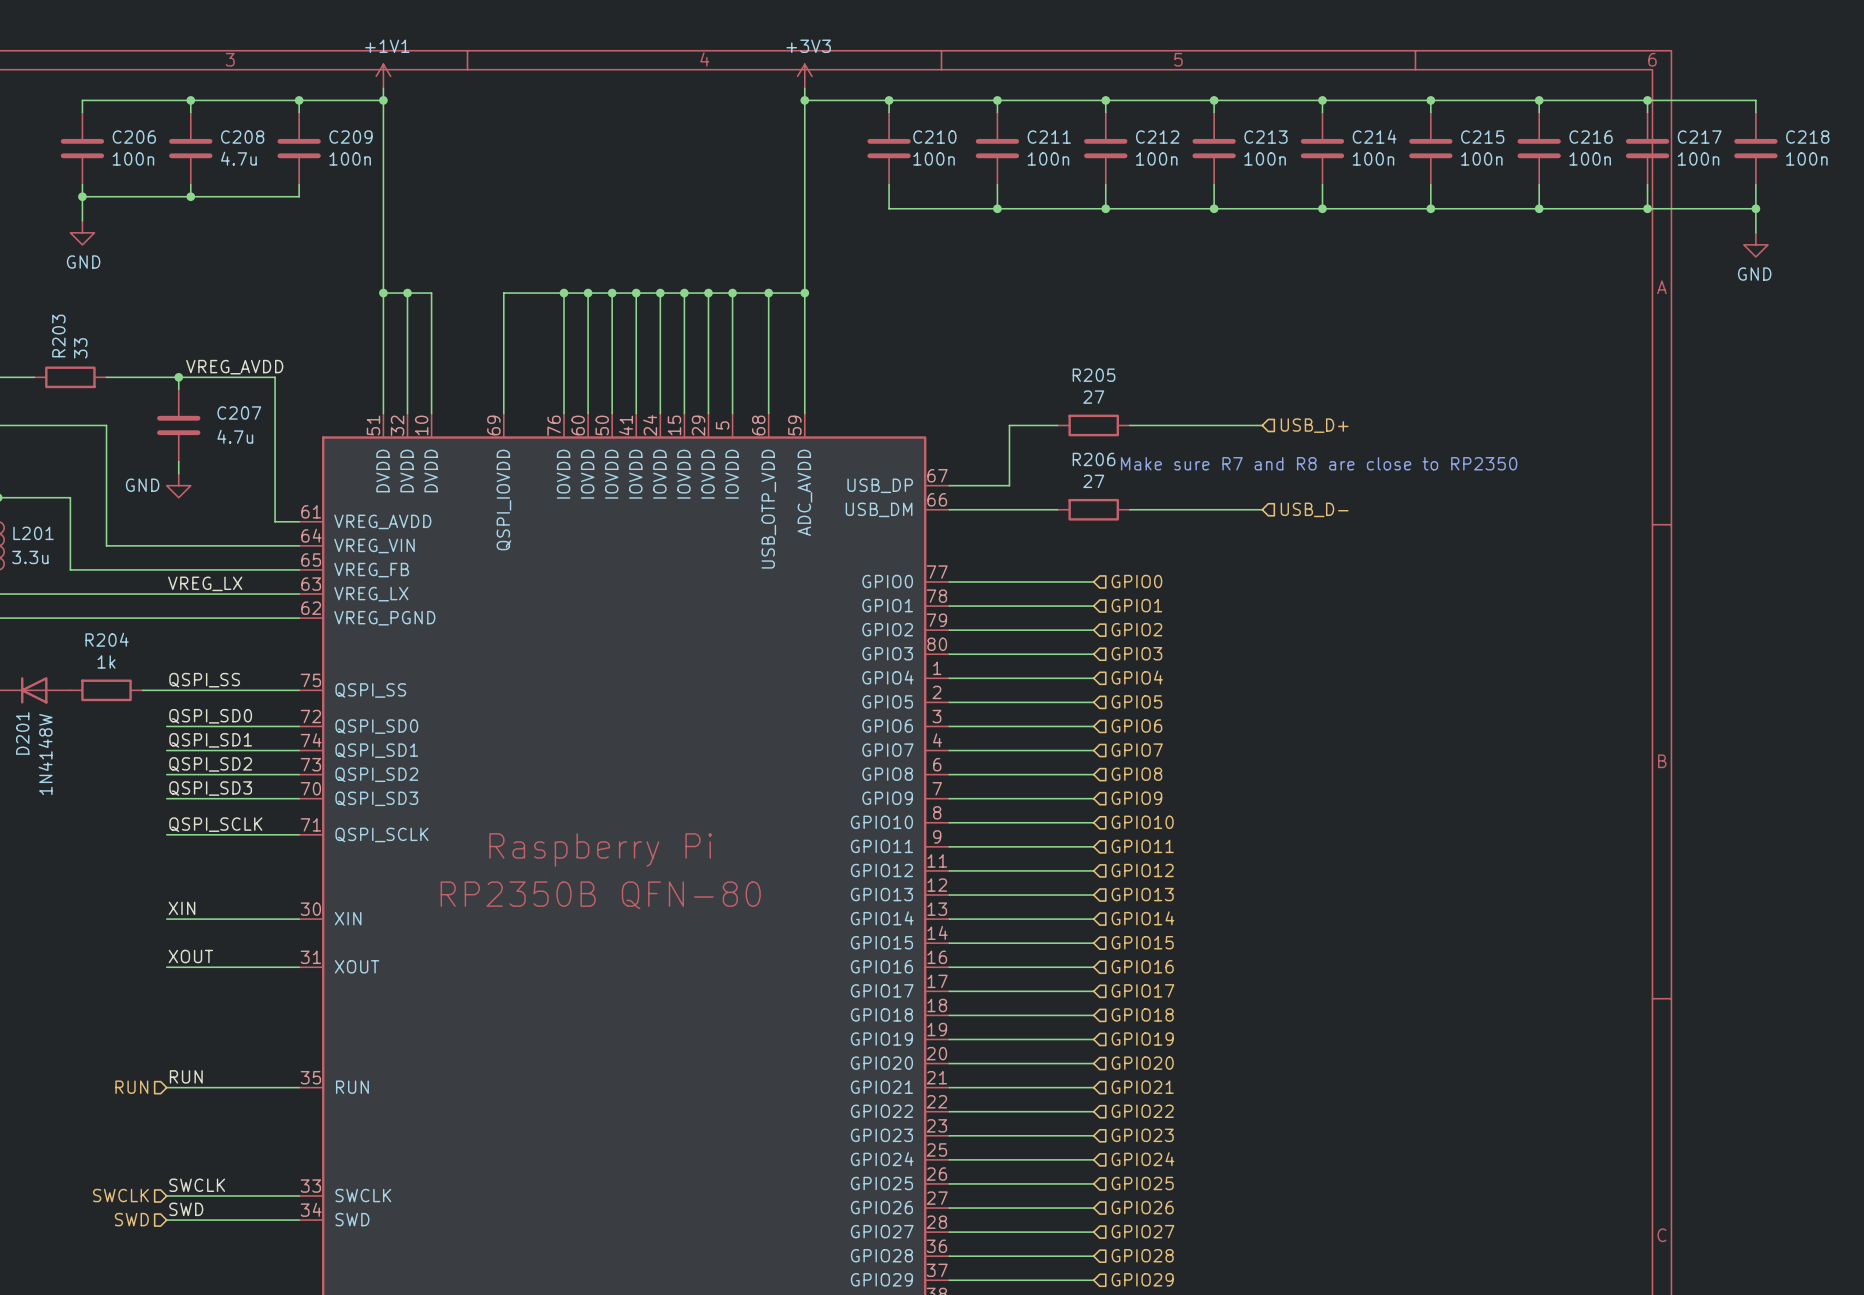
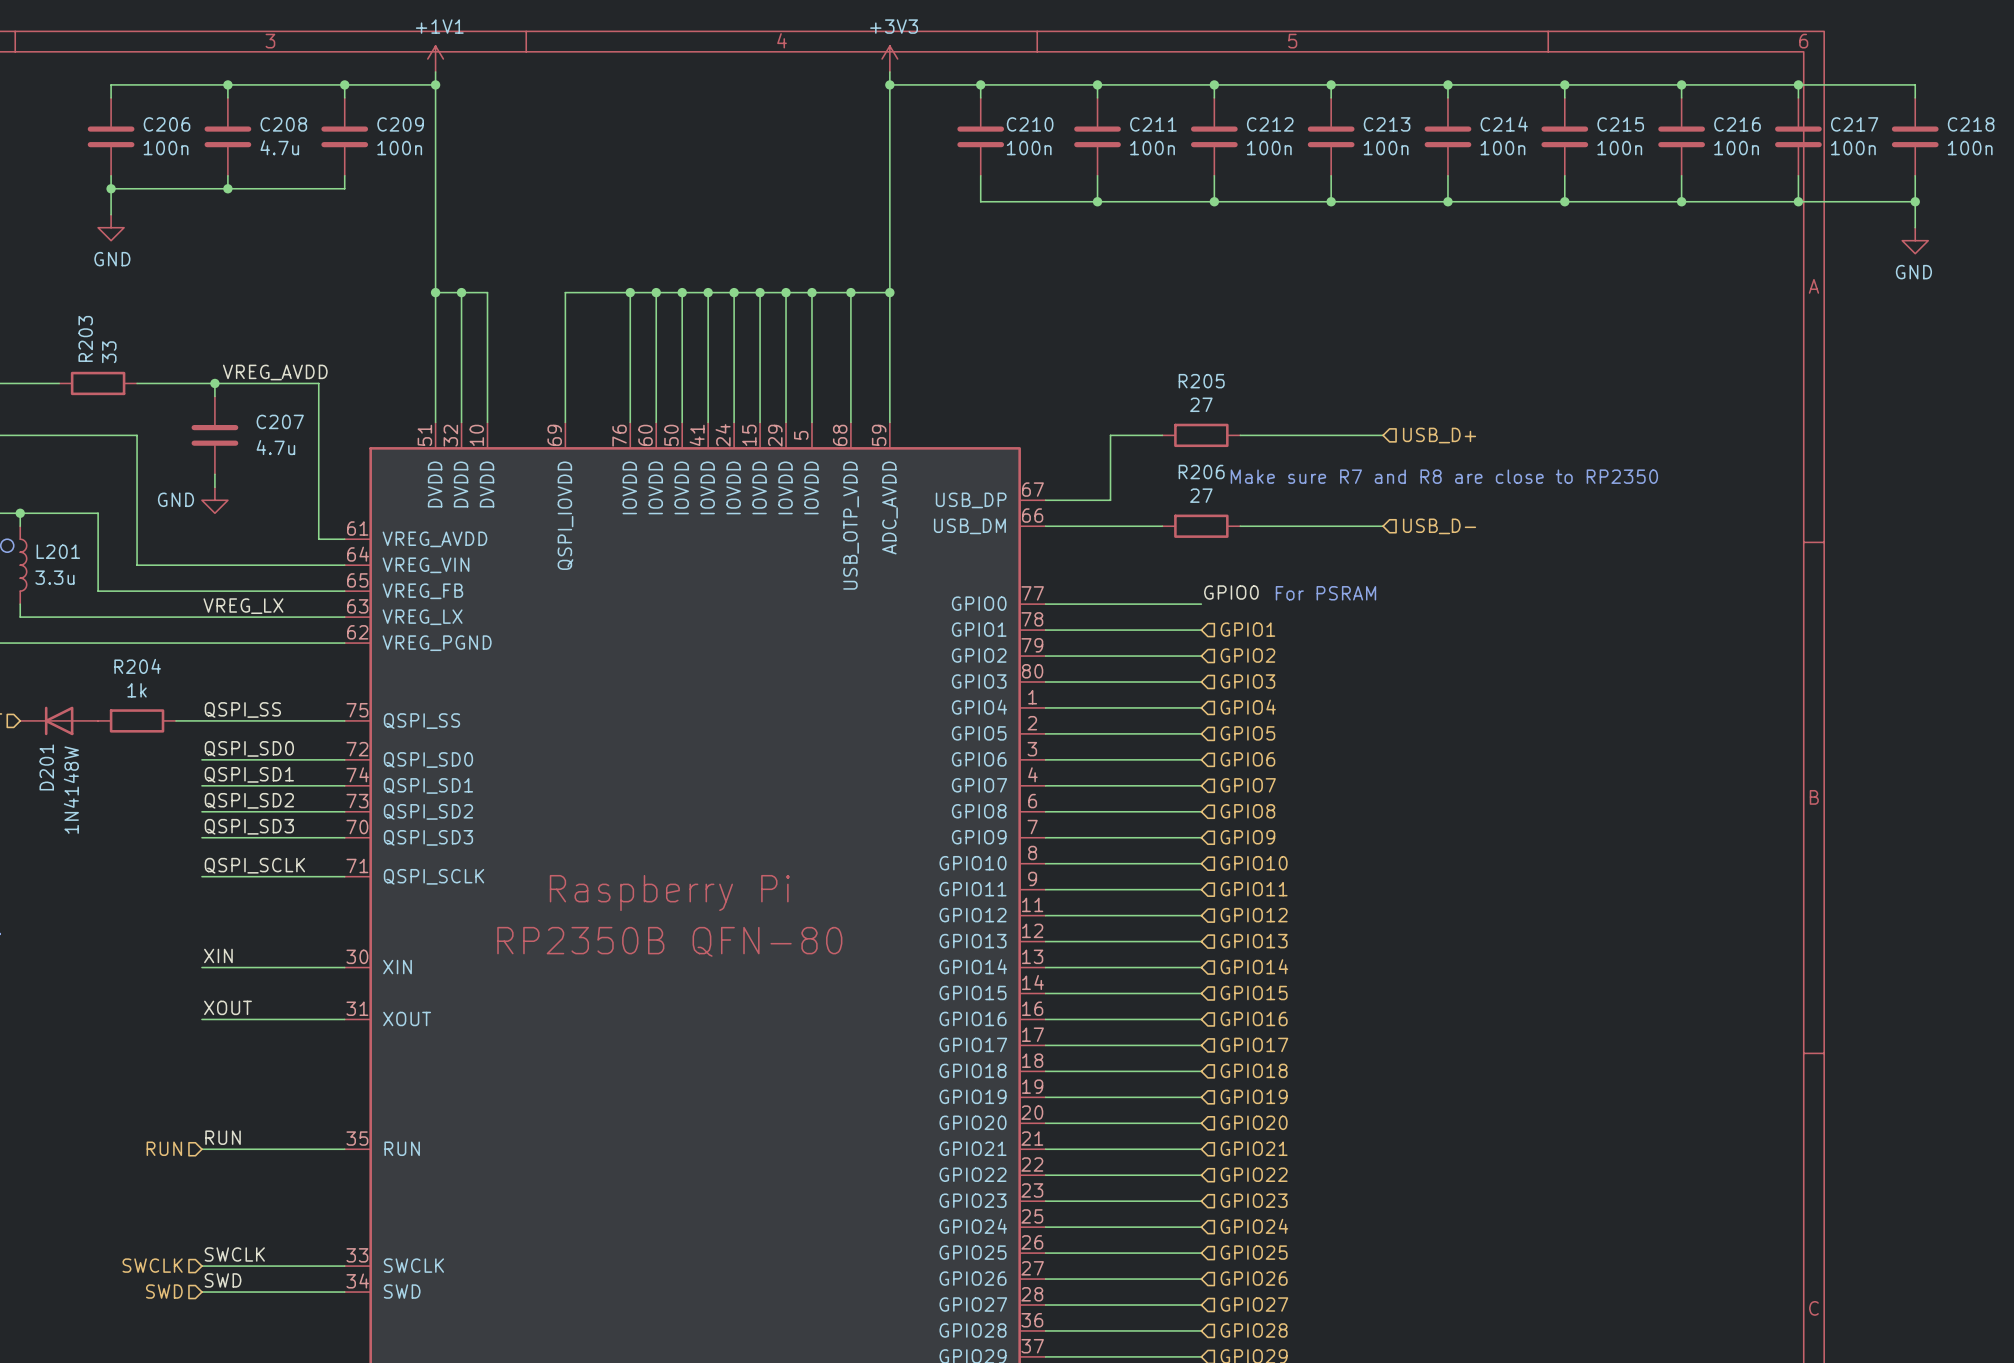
label: none -> GPIO0 (1231, 592)
text: none -> For PSRAM (1325, 593)
hierarchical label: GPIO0 (1136, 581) -> none

